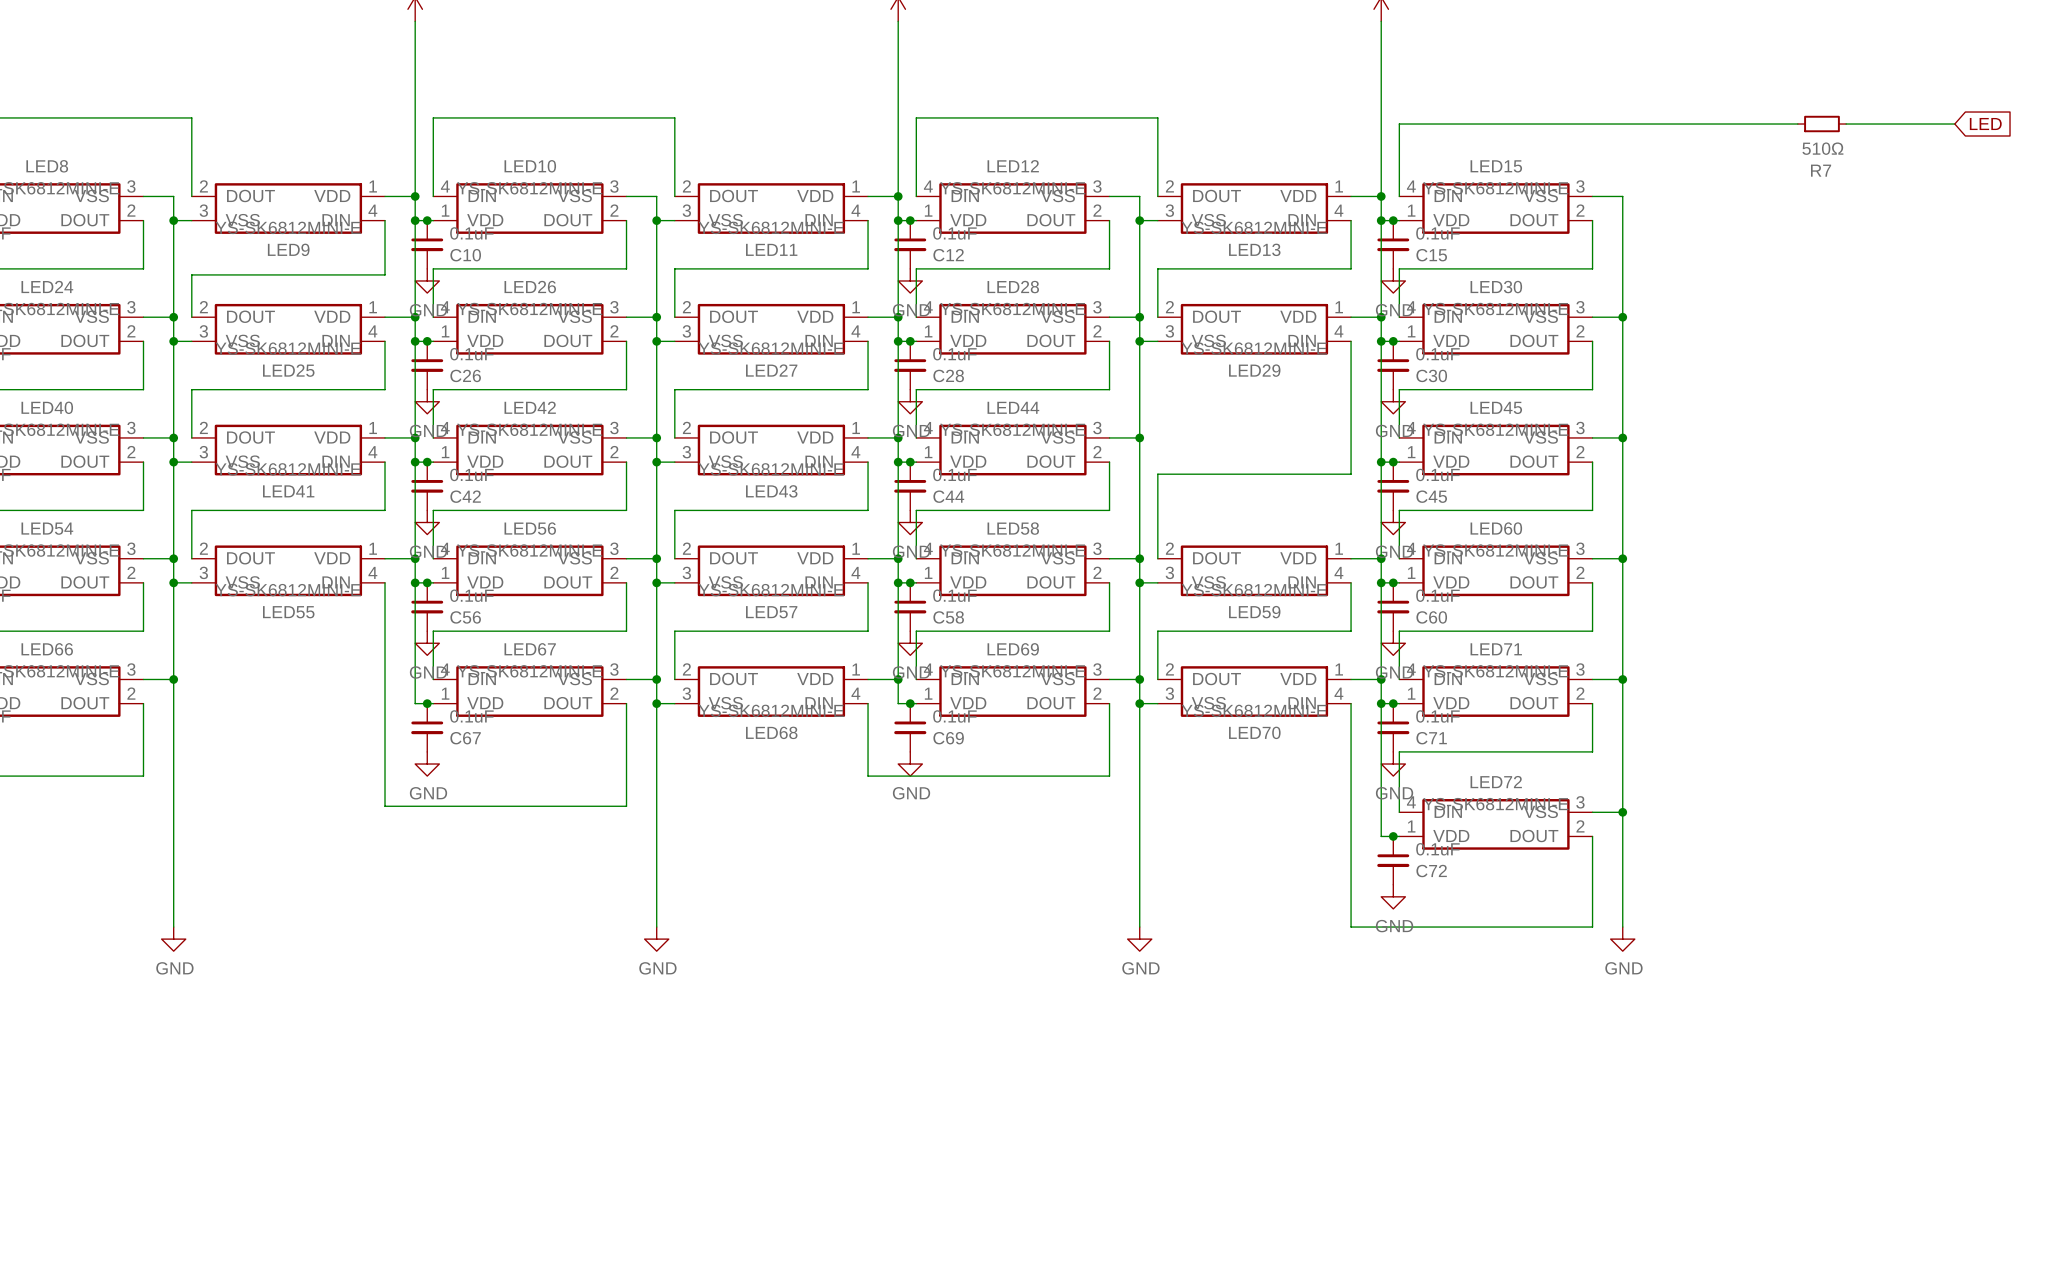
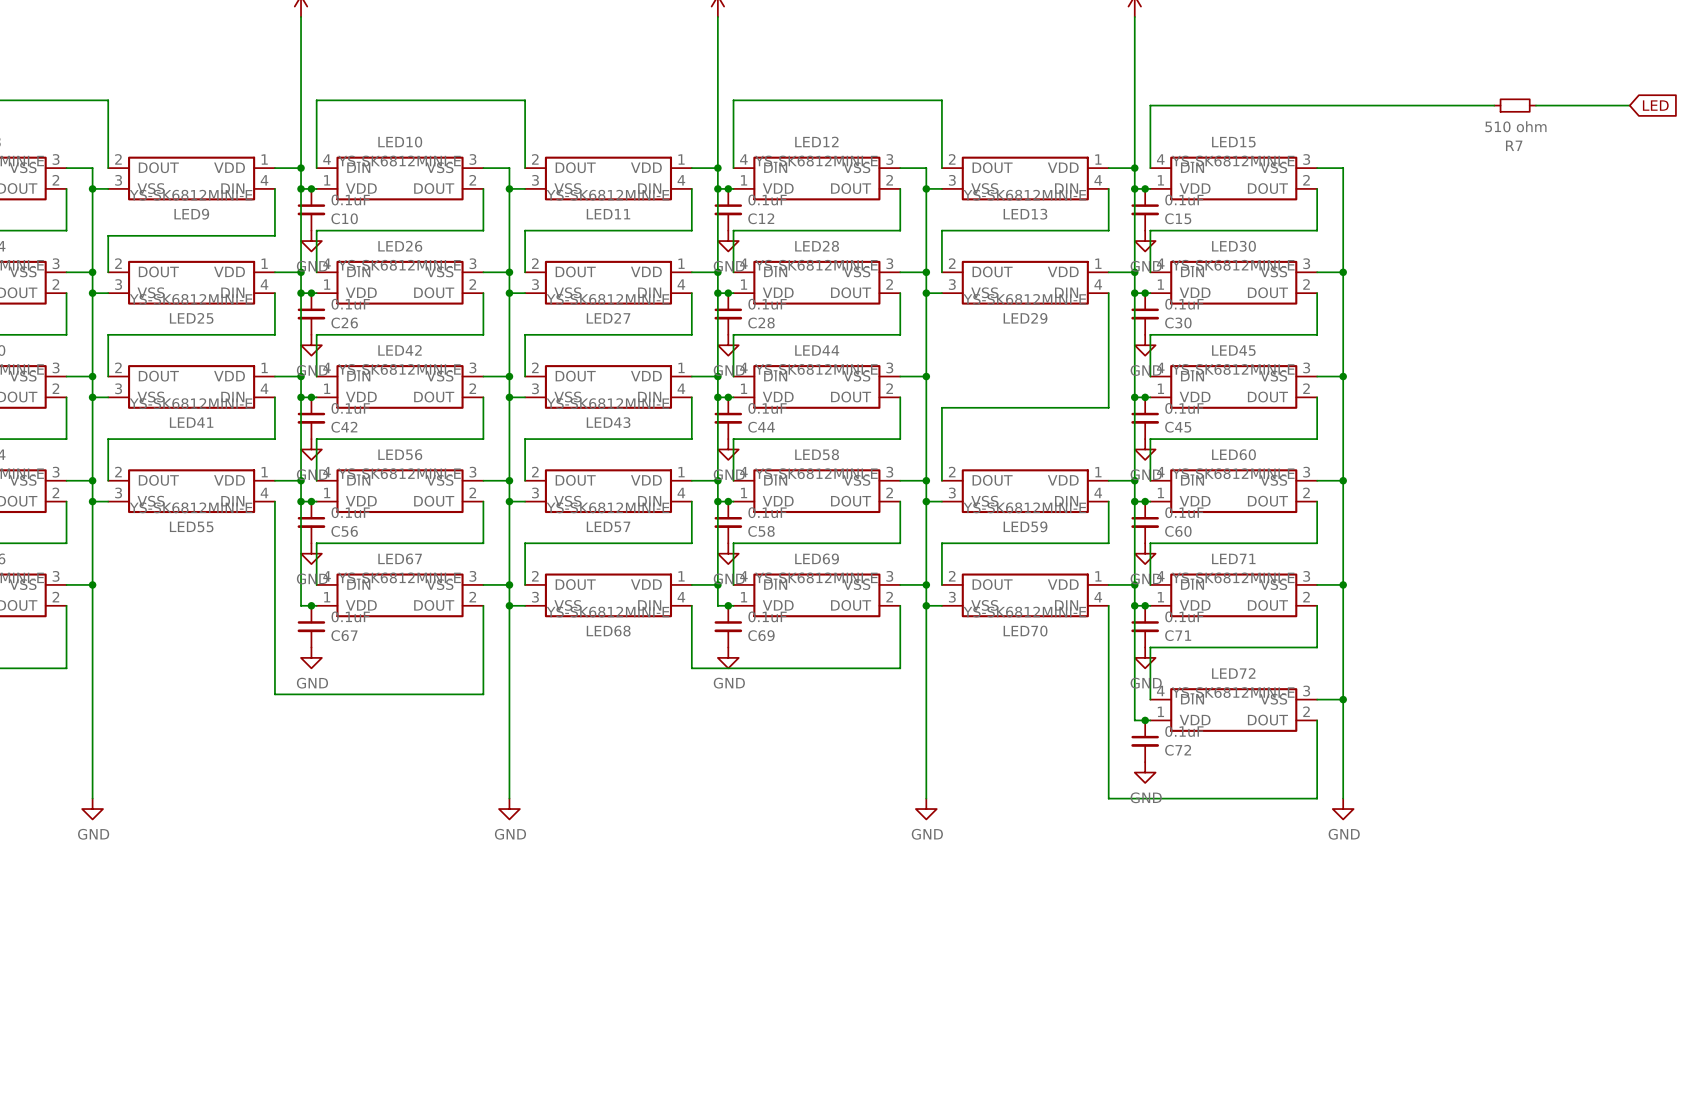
R7 value: 510Ω (1822, 148) -> 510 ohm (1515, 126)

